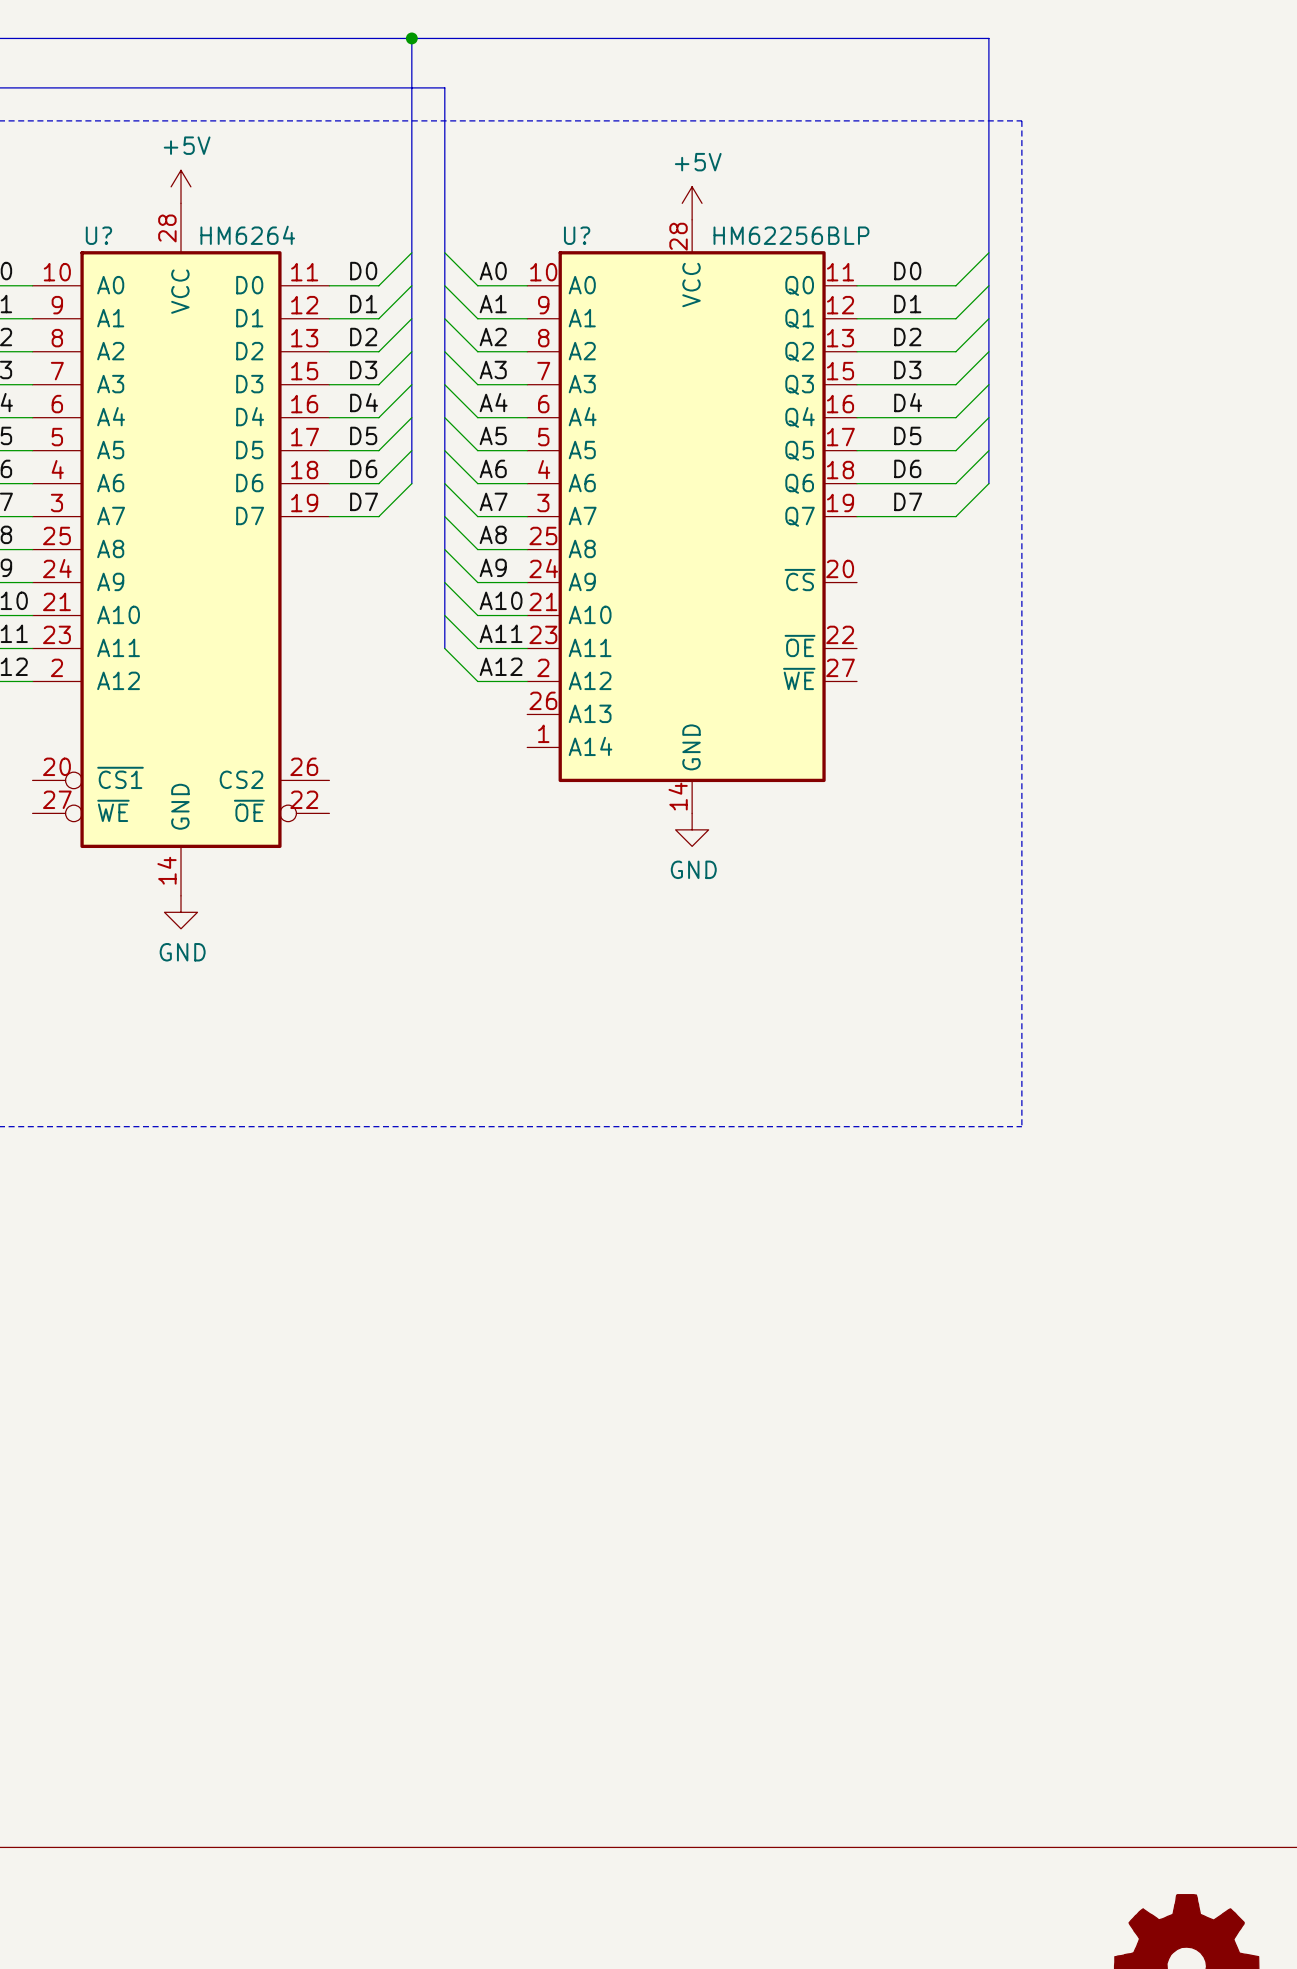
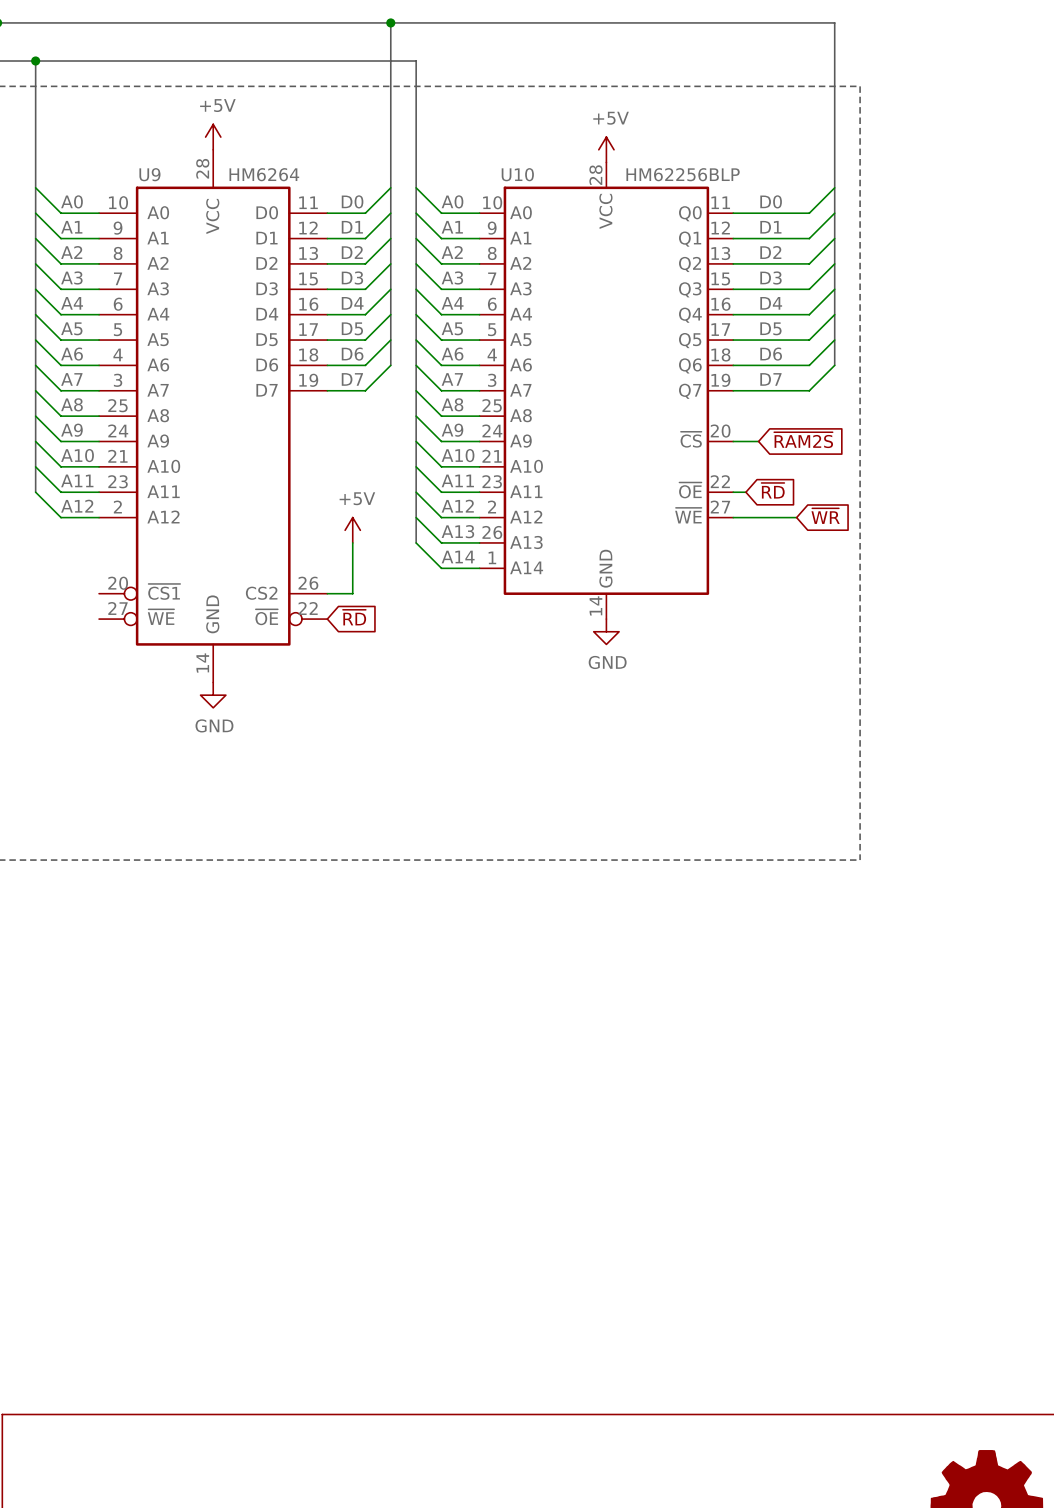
U? name: U? (98, 235) -> U9 (149, 174)
U? name: U? (577, 235) -> U10 (517, 174)
global label: none -> ~{RAM2S} (803, 440)
wire: none -> (733, 441) (758, 441)
global label: none -> ~{RD} (773, 490)
bus: none -> (416, 492) (416, 542)
wire: none -> (733, 492) (745, 492)
global label: none -> ~{WR} (825, 516)
wire: none -> (416, 517) (441, 542) (479, 542)
wire: none -> (733, 517) (796, 517)
power symbol: none -> +5V (352, 530)
label: none -> A13 (457, 531)
wire: none -> (352, 542) (352, 593) (327, 593)
wire: none -> (416, 542) (441, 568) (479, 568)
label: none -> A14 (458, 557)
global label: none -> ~{RD} (354, 617)

